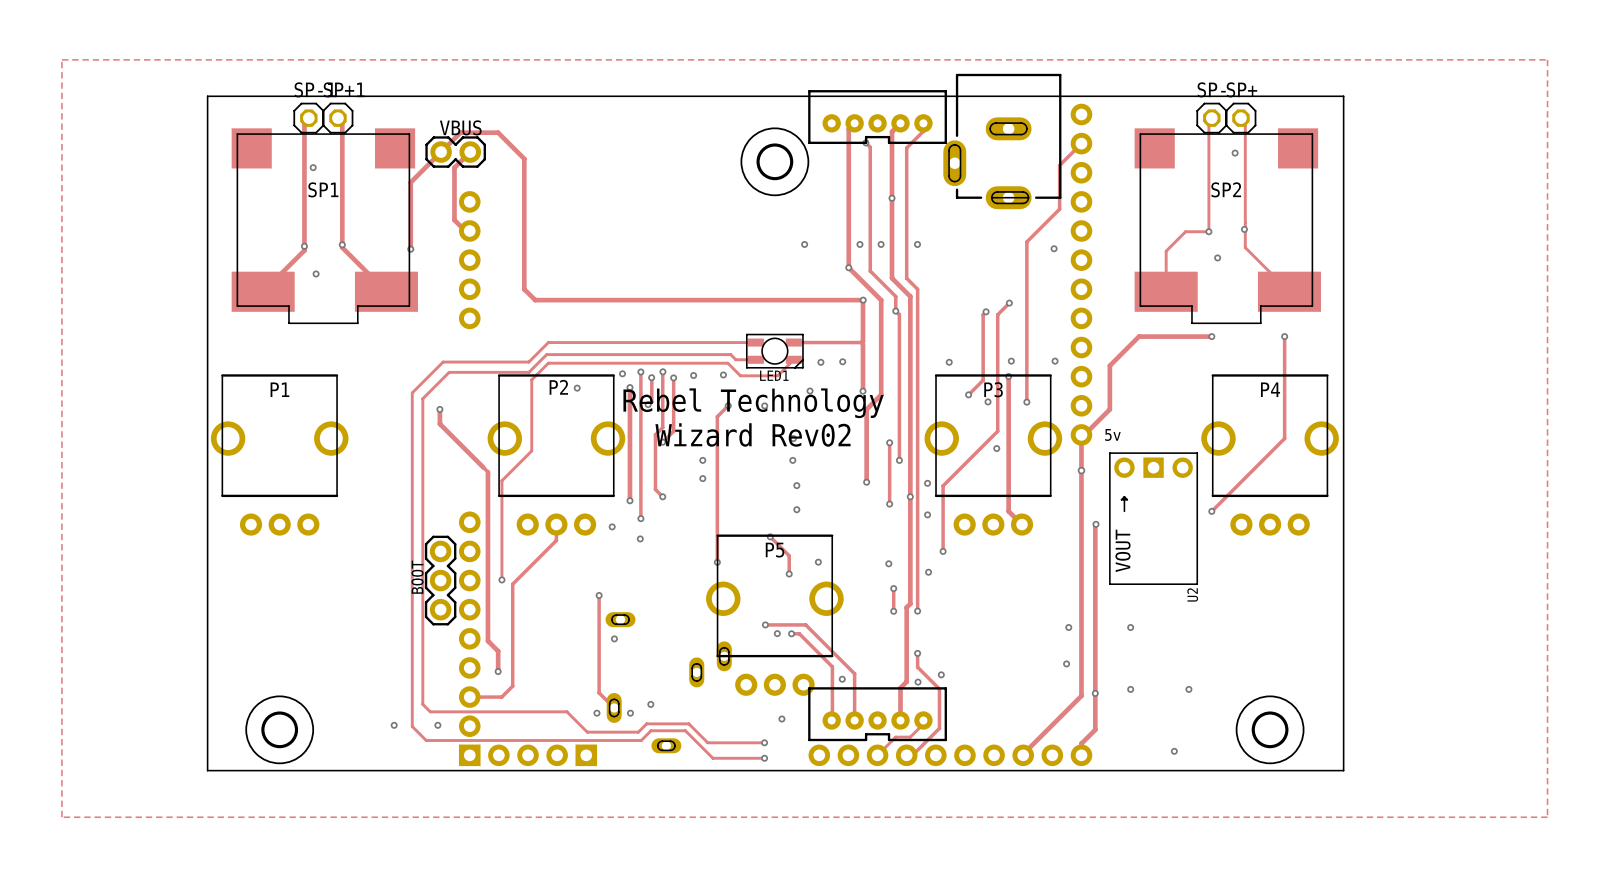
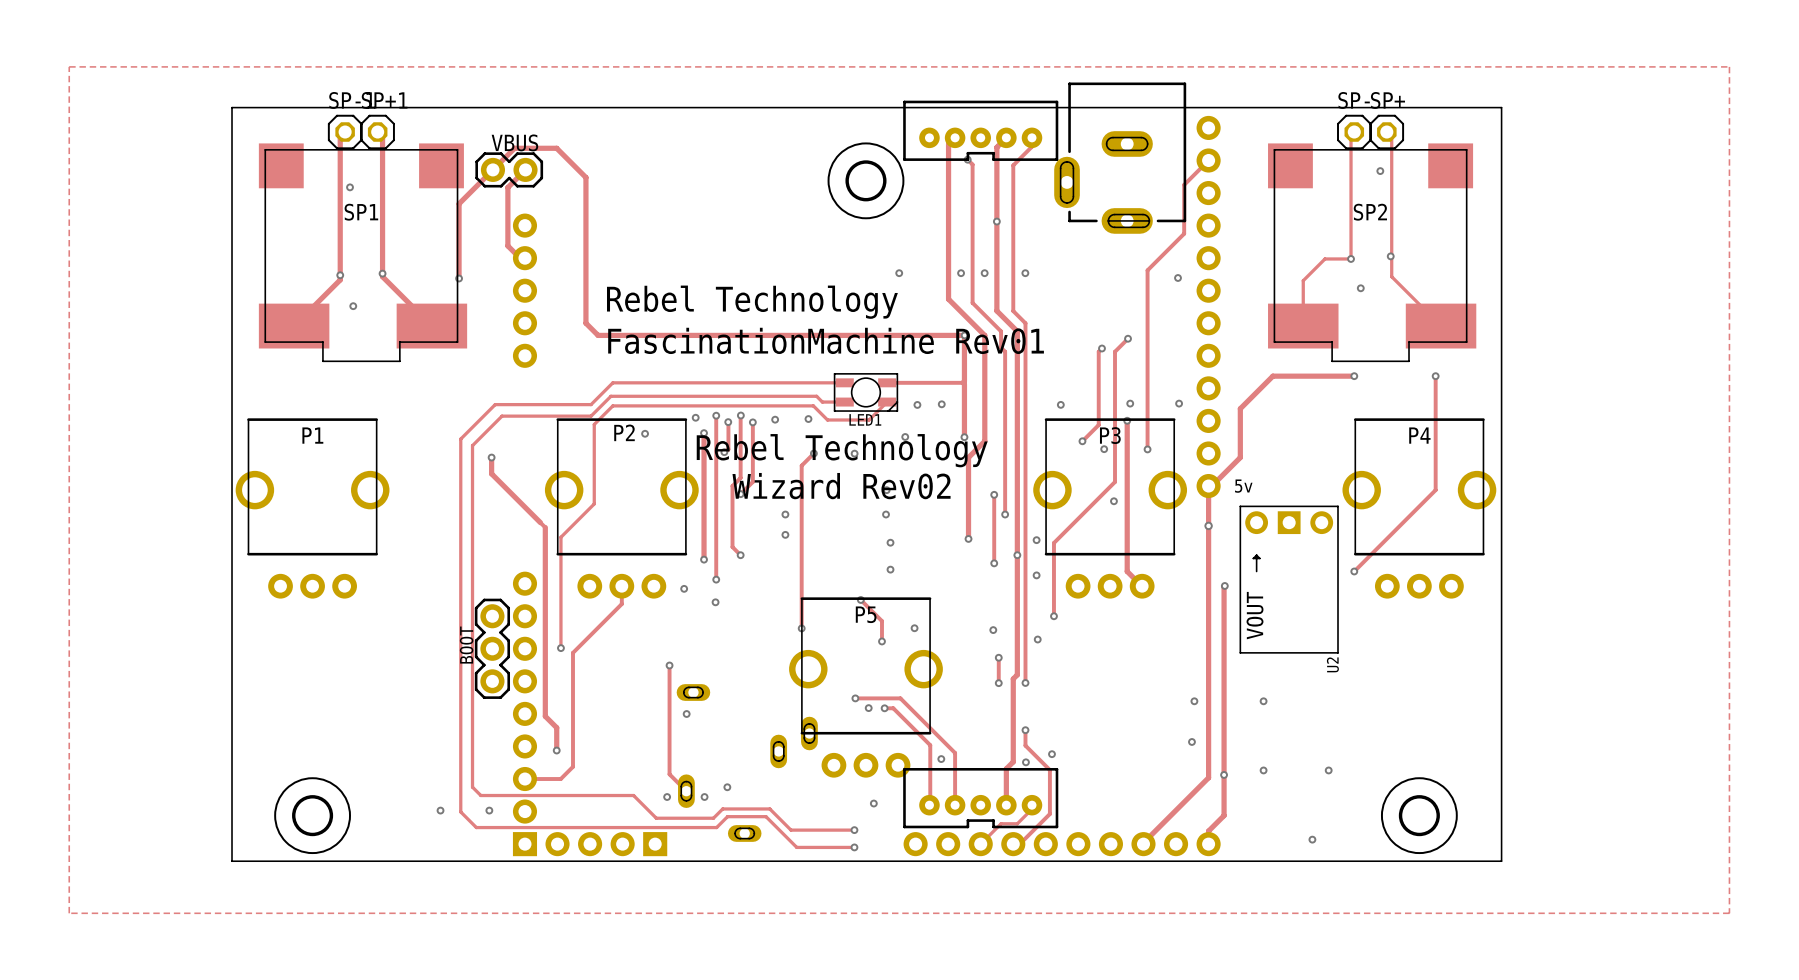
via: (848, 267) -> none
text: none -> Rebel Technology (752, 302)
text: none -> FascinationMachine Rev01 (826, 340)
via: (895, 311) -> none

